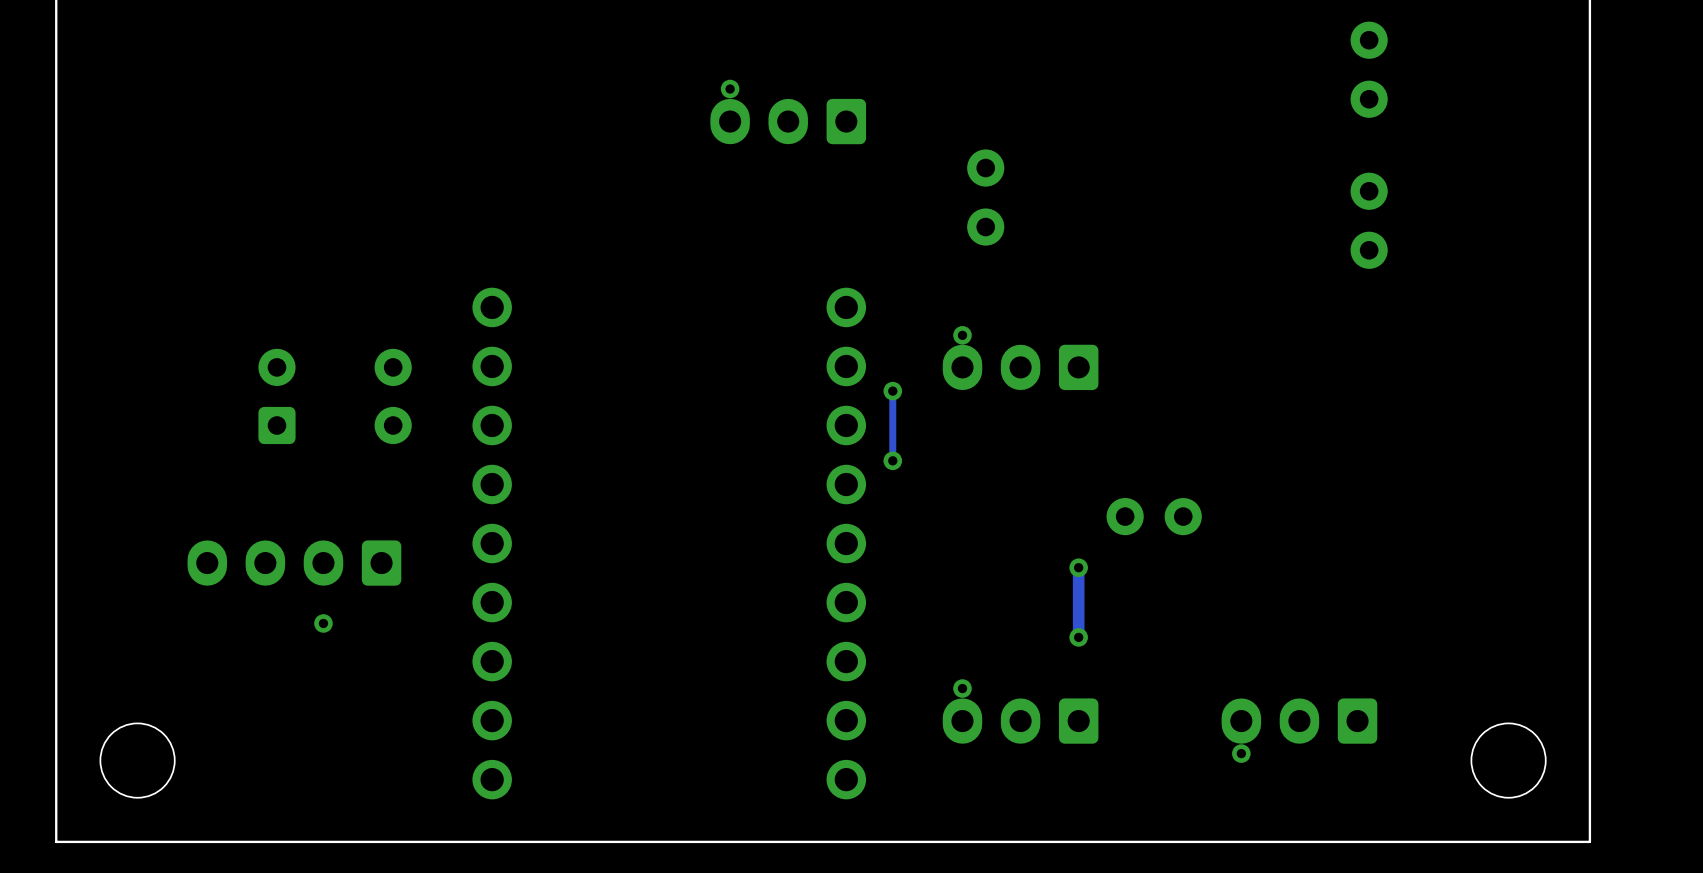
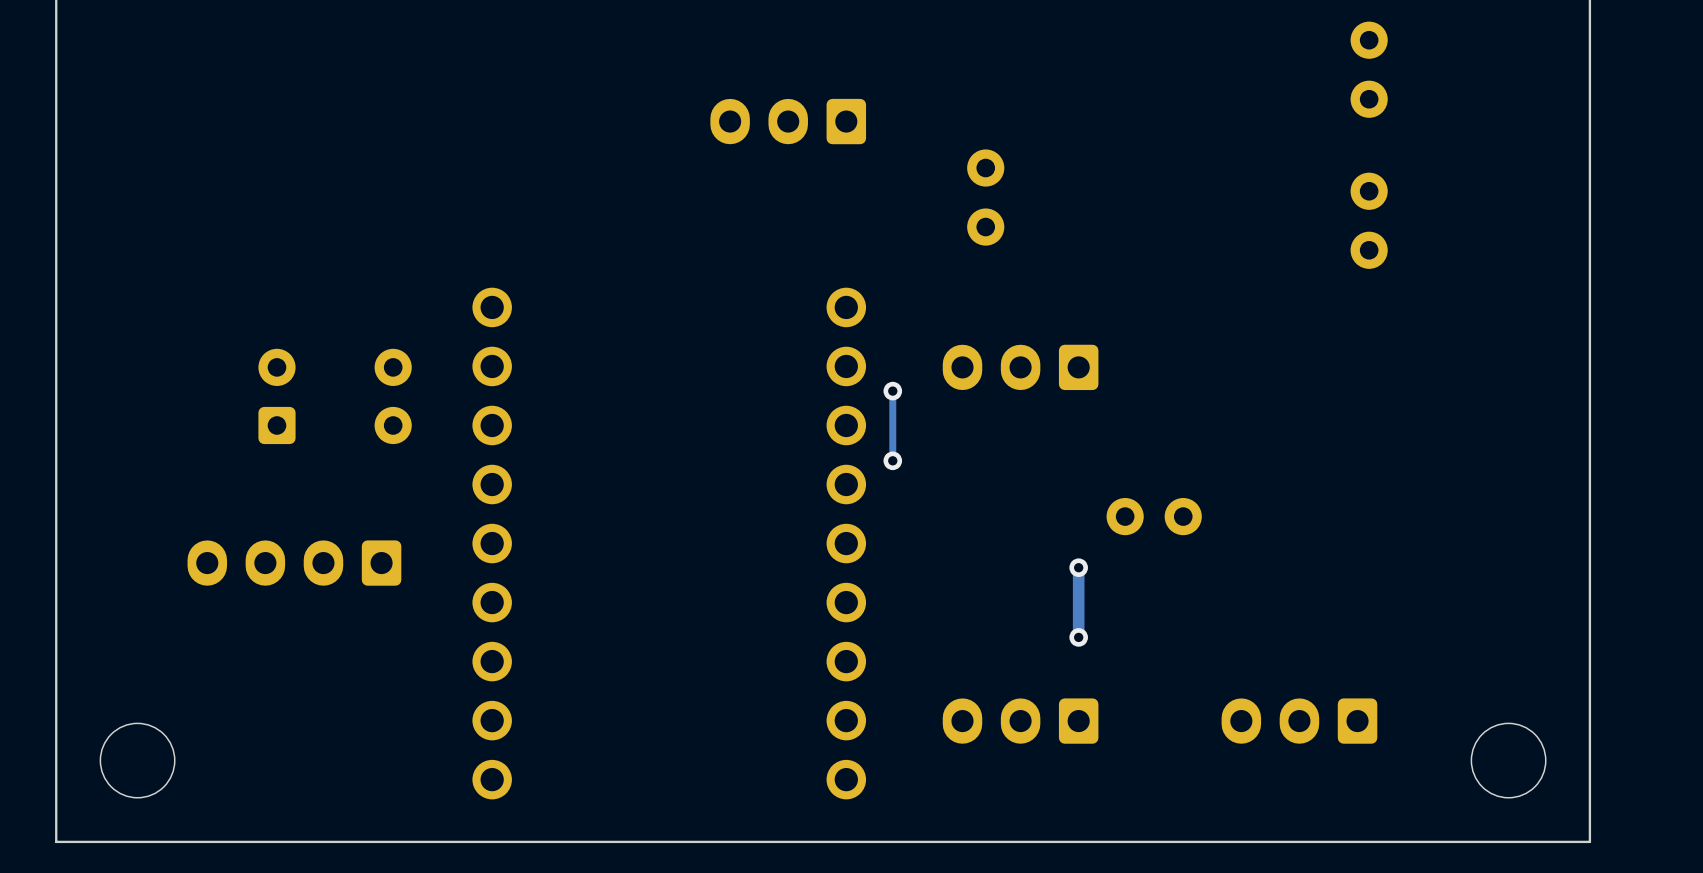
via: (730, 89) -> none
via: (962, 335) -> none
via: (323, 623) -> none
via: (962, 688) -> none
via: (1241, 753) -> none

